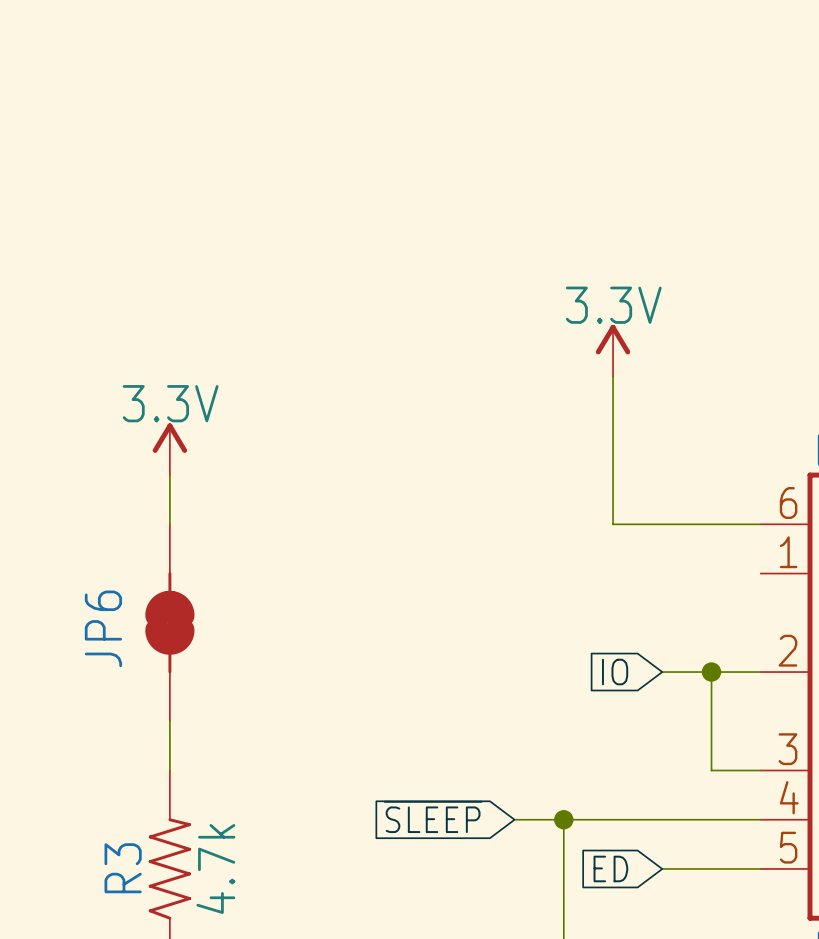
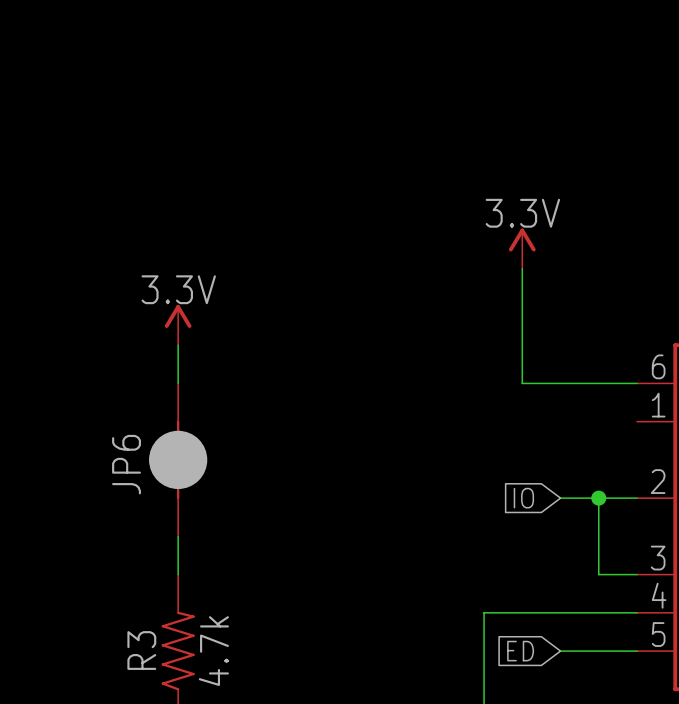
JP6 symbol: [145, 524, 195, 722] -> [149, 383, 208, 537]
global label: ~{SLEEP} (433, 816) -> none
wire: (514, 819) (563, 819) -> none
junction: (563, 819) -> none

